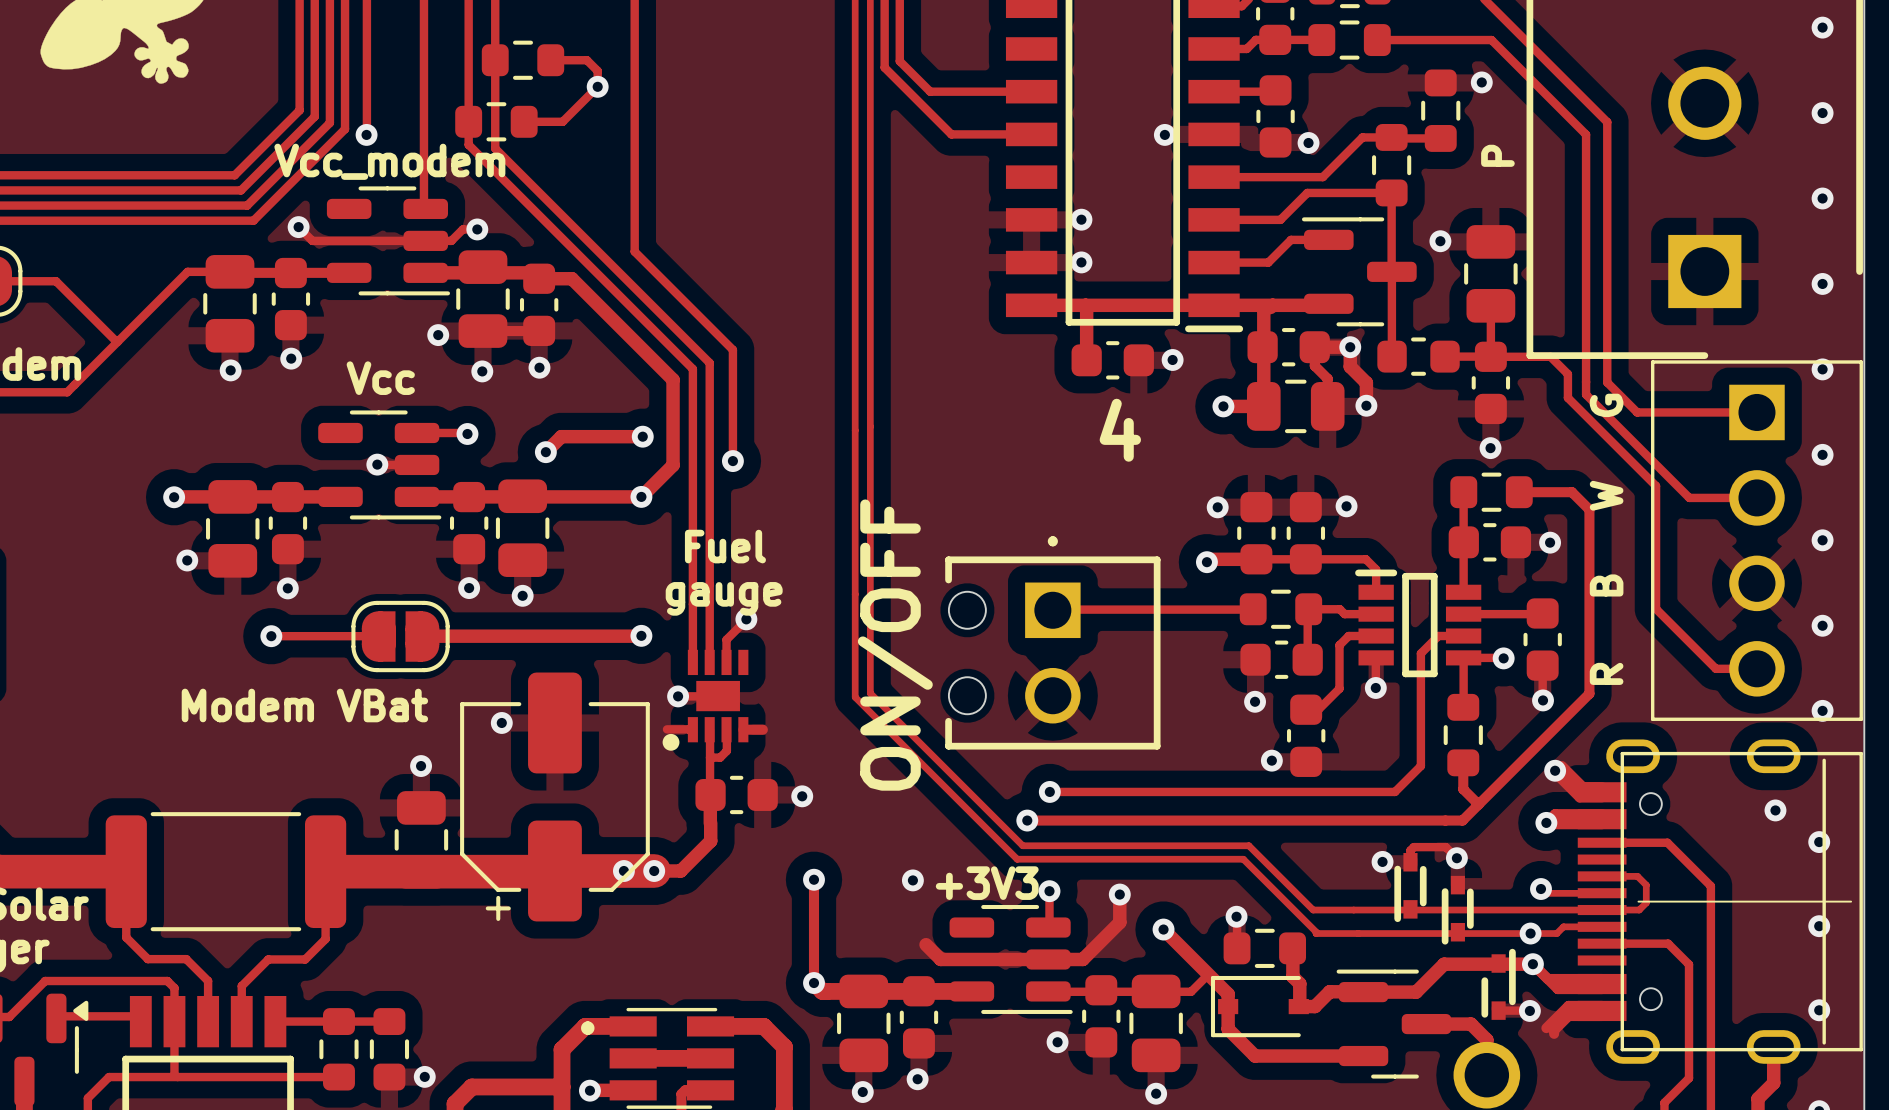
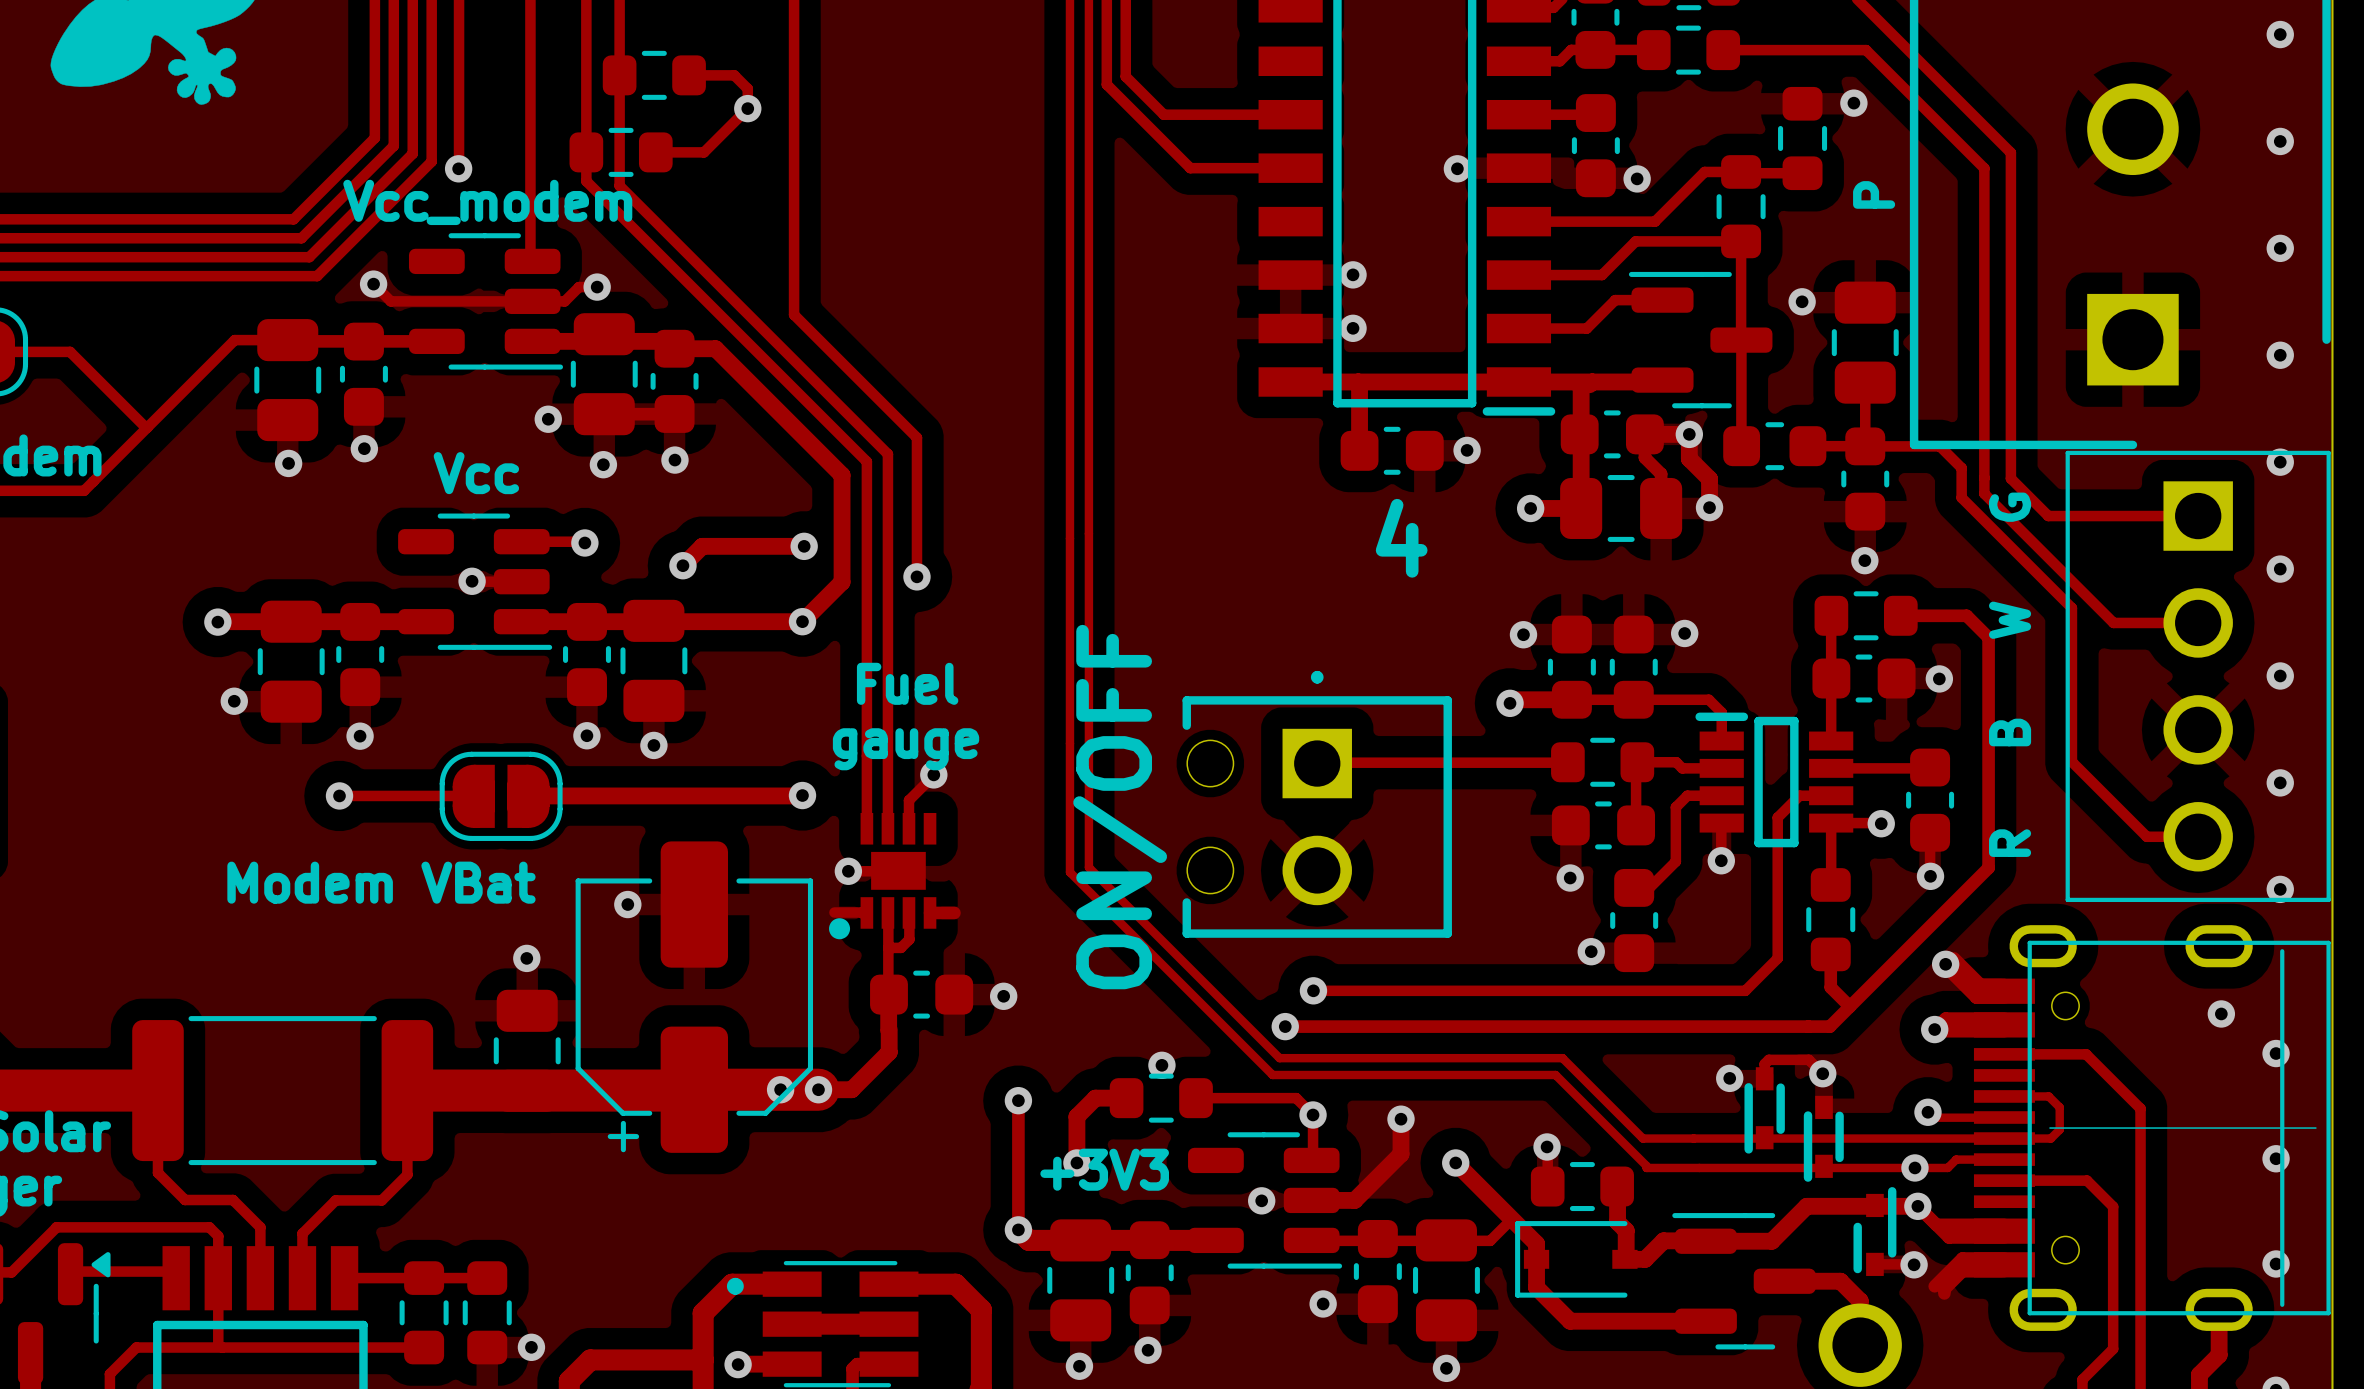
track: none -> (1126, 1098) (1095, 1098) (1076, 1116) (1076, 1162)
part: none -> (1161, 1098)
track: none -> (1196, 1098) (1296, 1098) (1313, 1114)
via position: (912, 880) -> (1161, 1065)
text position: +3V3 (987, 883) -> +3V3 (1104, 1169)
via: none -> (1076, 1162)
track: (926, 944) (940, 959) (1048, 959) -> none
via: none -> (1261, 1200)

